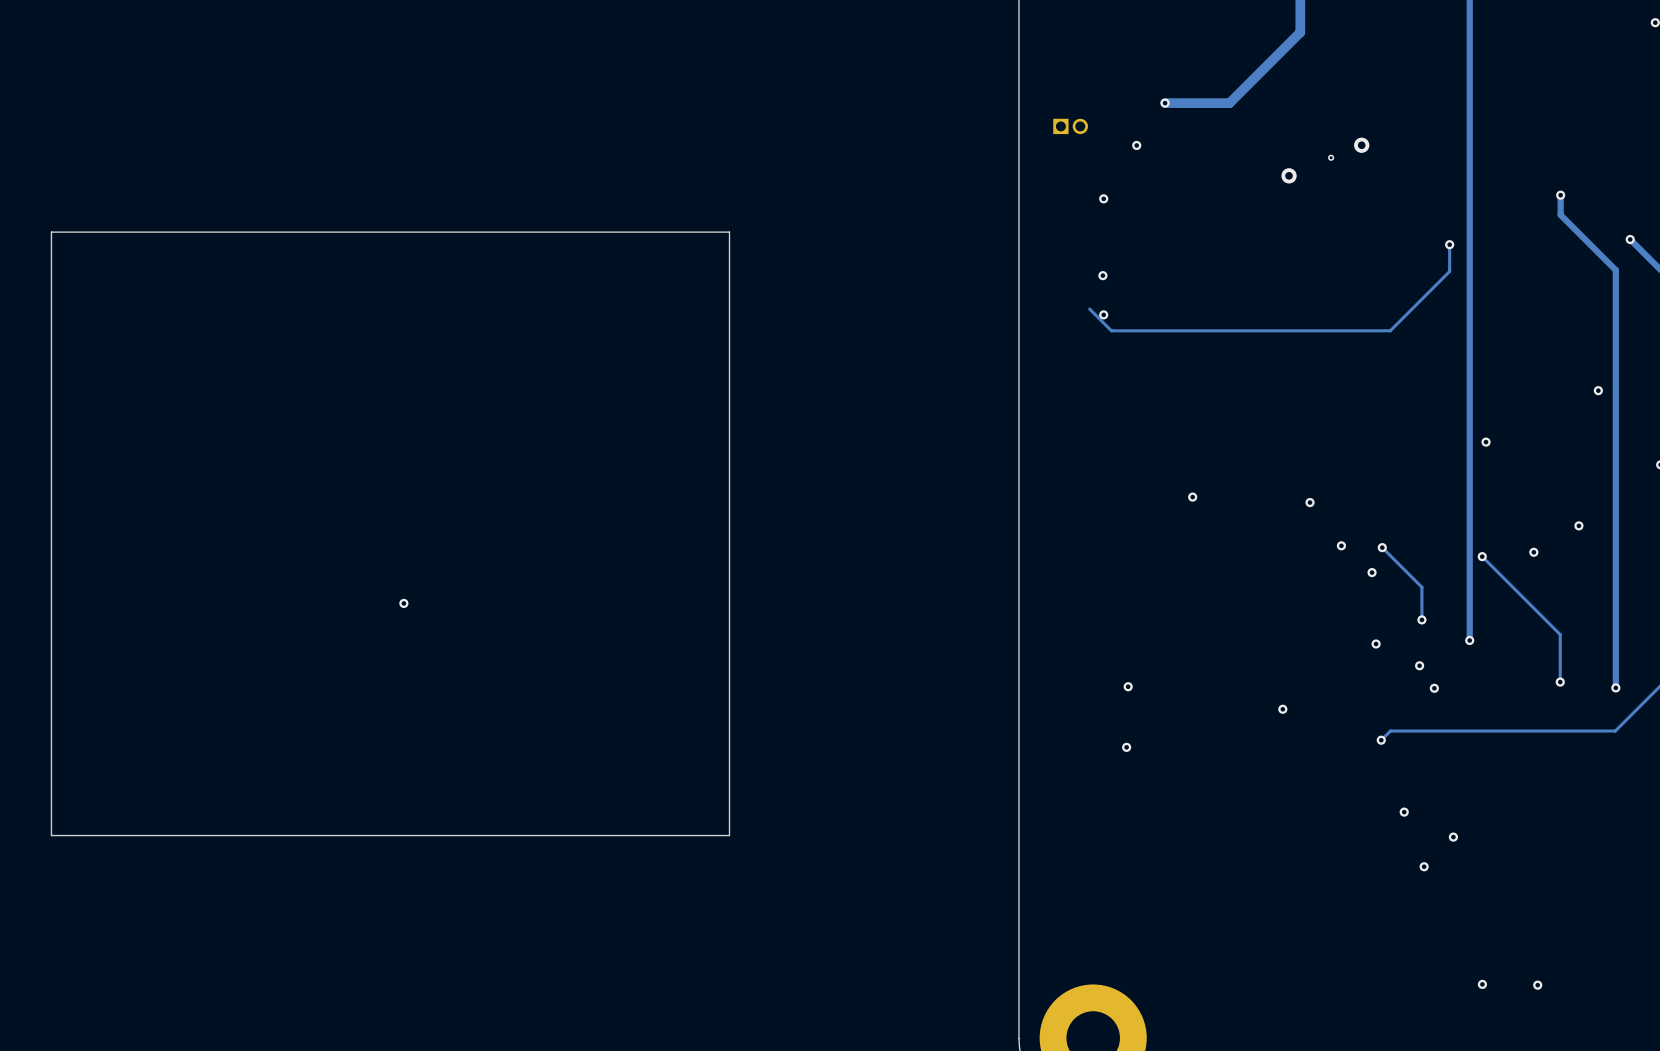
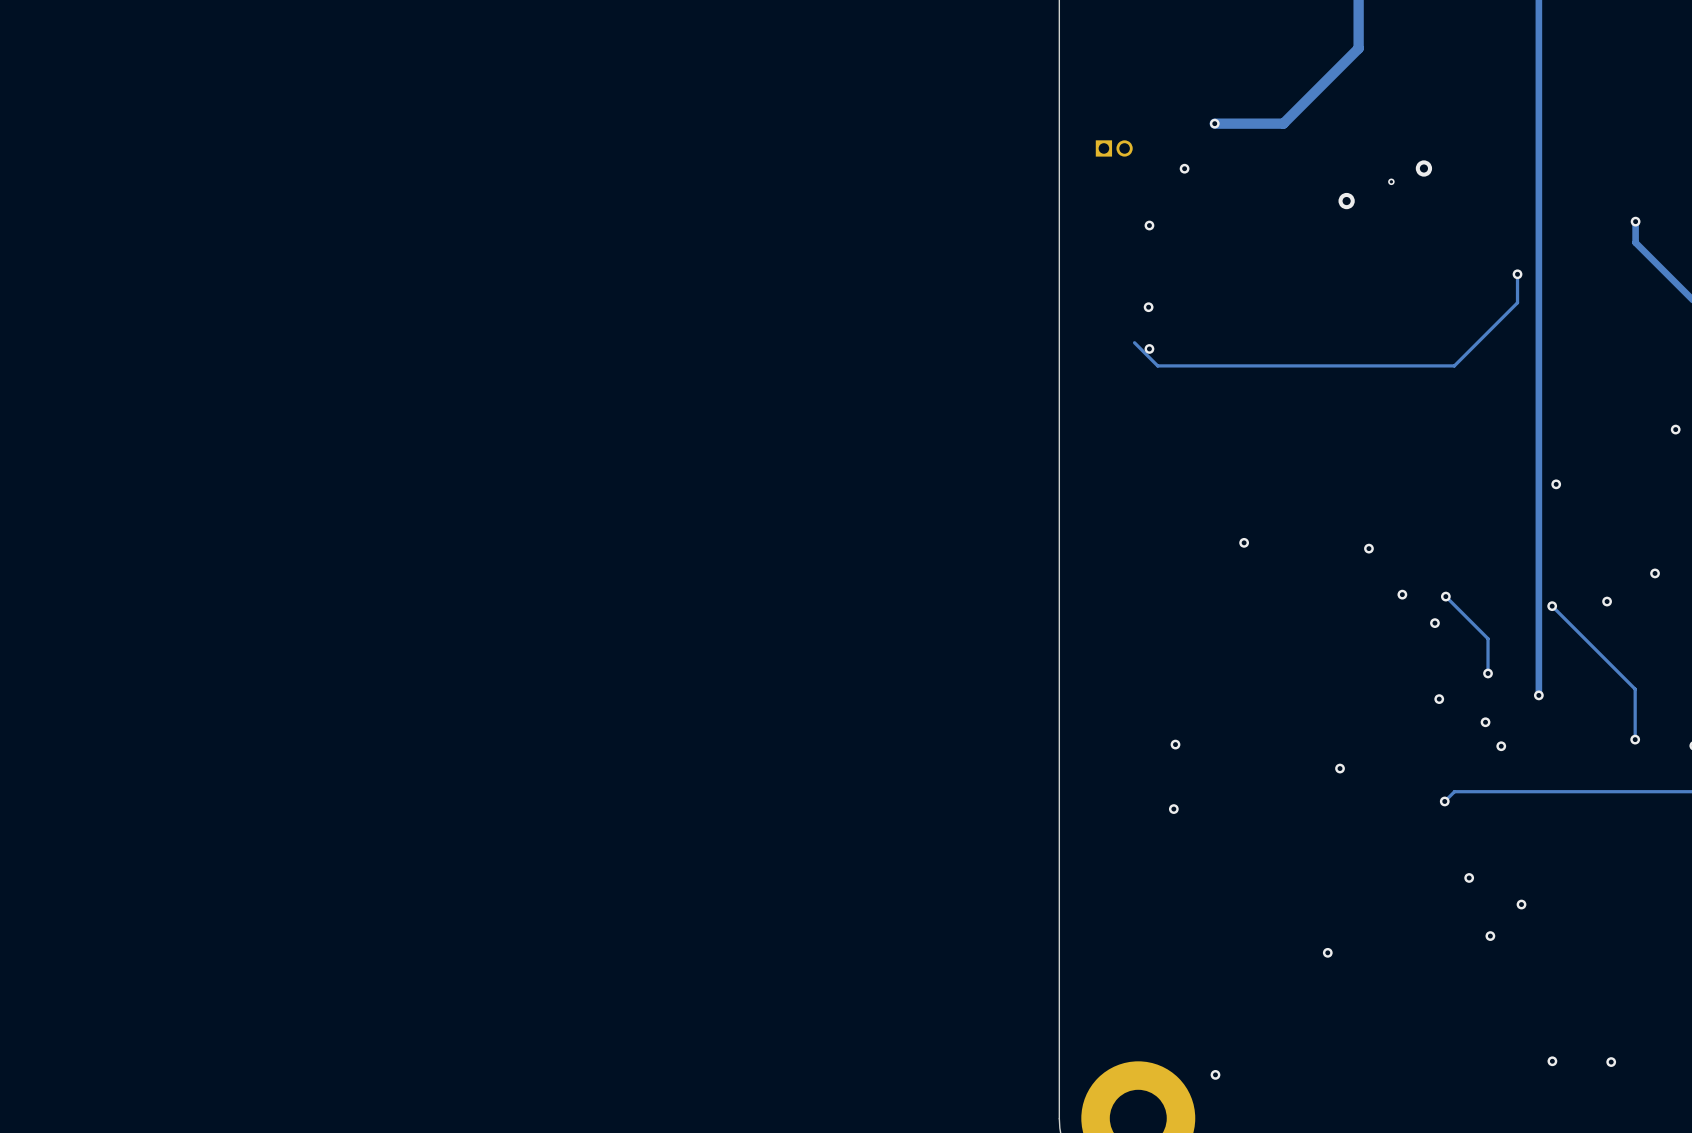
board edge: (729, 232) (51, 232) (51, 835) (729, 835) (729, 232) -> none
via: (403, 603) -> none
via: none -> (1327, 952)
via: none -> (1215, 1074)

